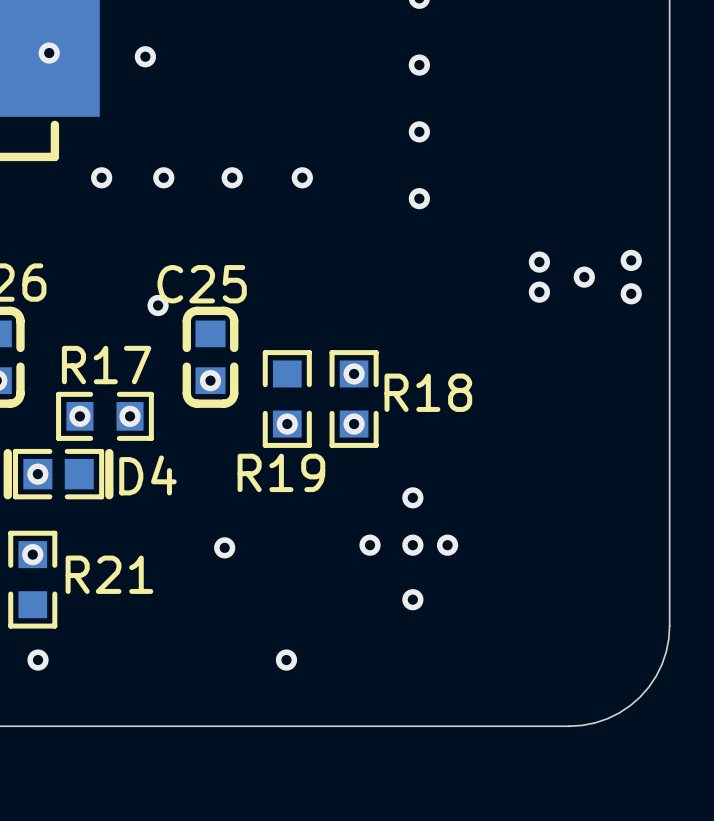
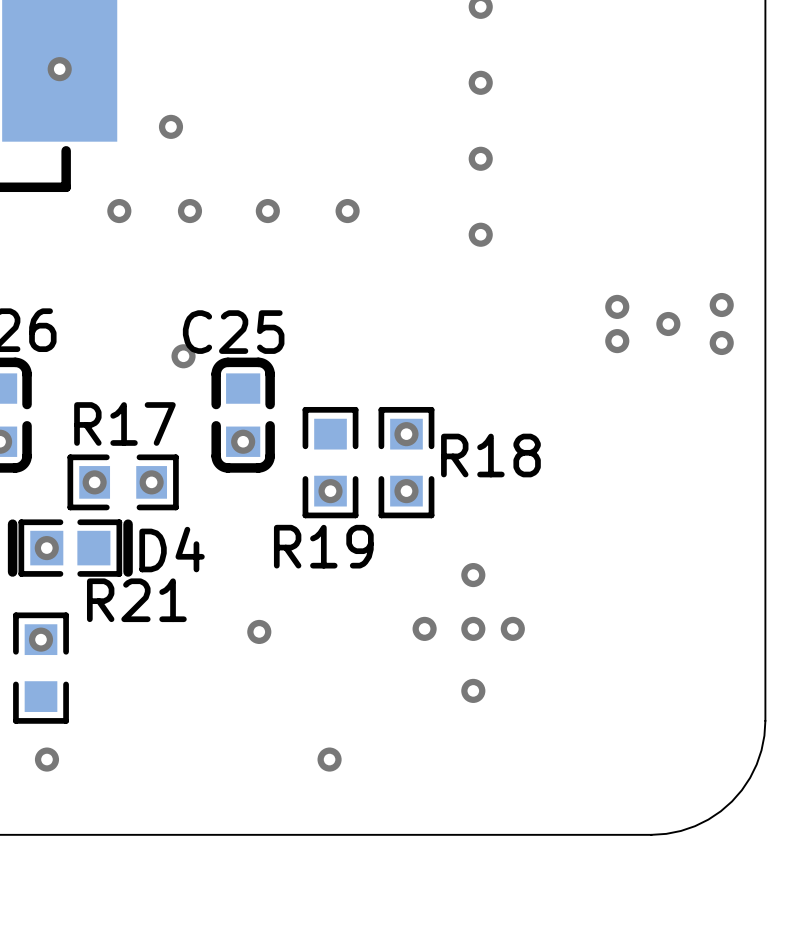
via position: (145, 56) -> (170, 126)
R21 name position: R21 (109, 574) -> R21 (136, 600)

